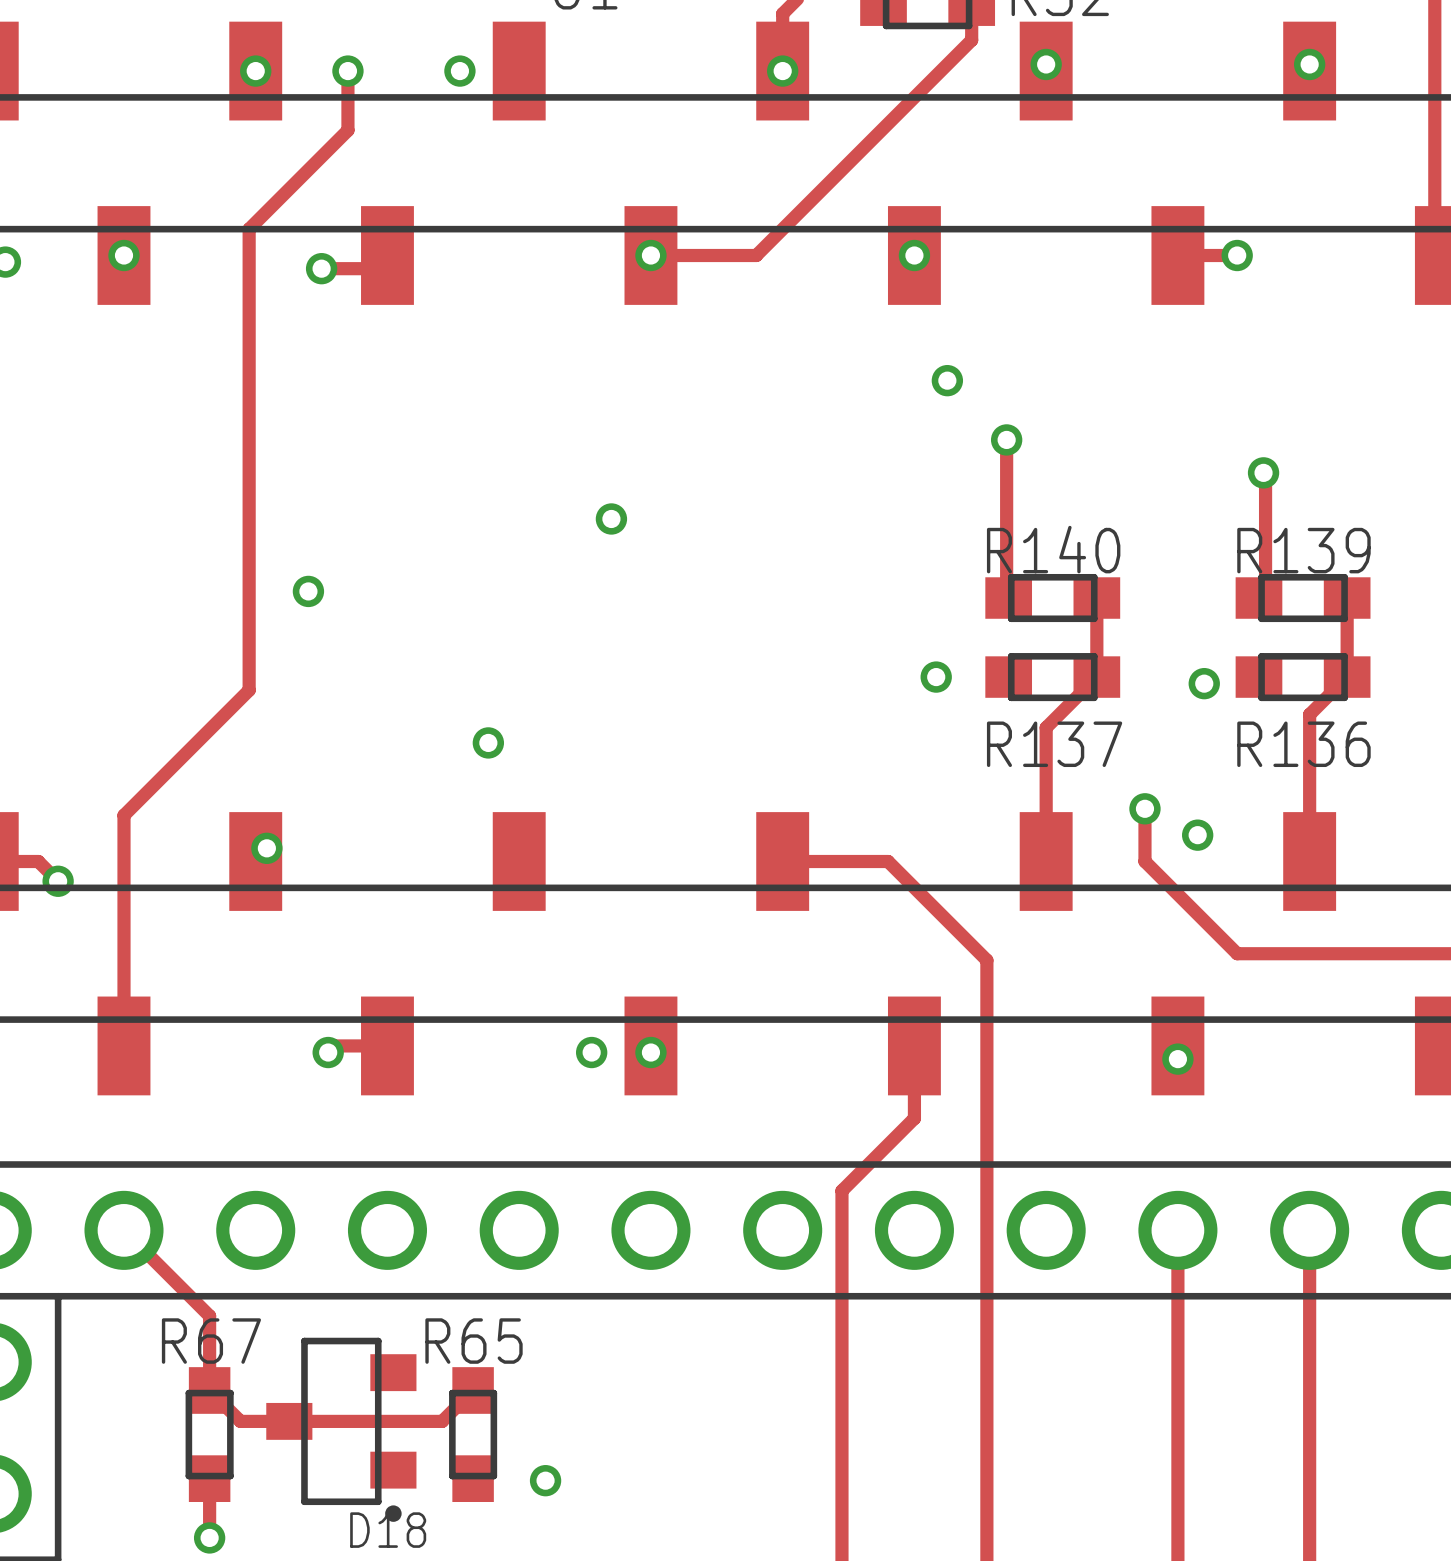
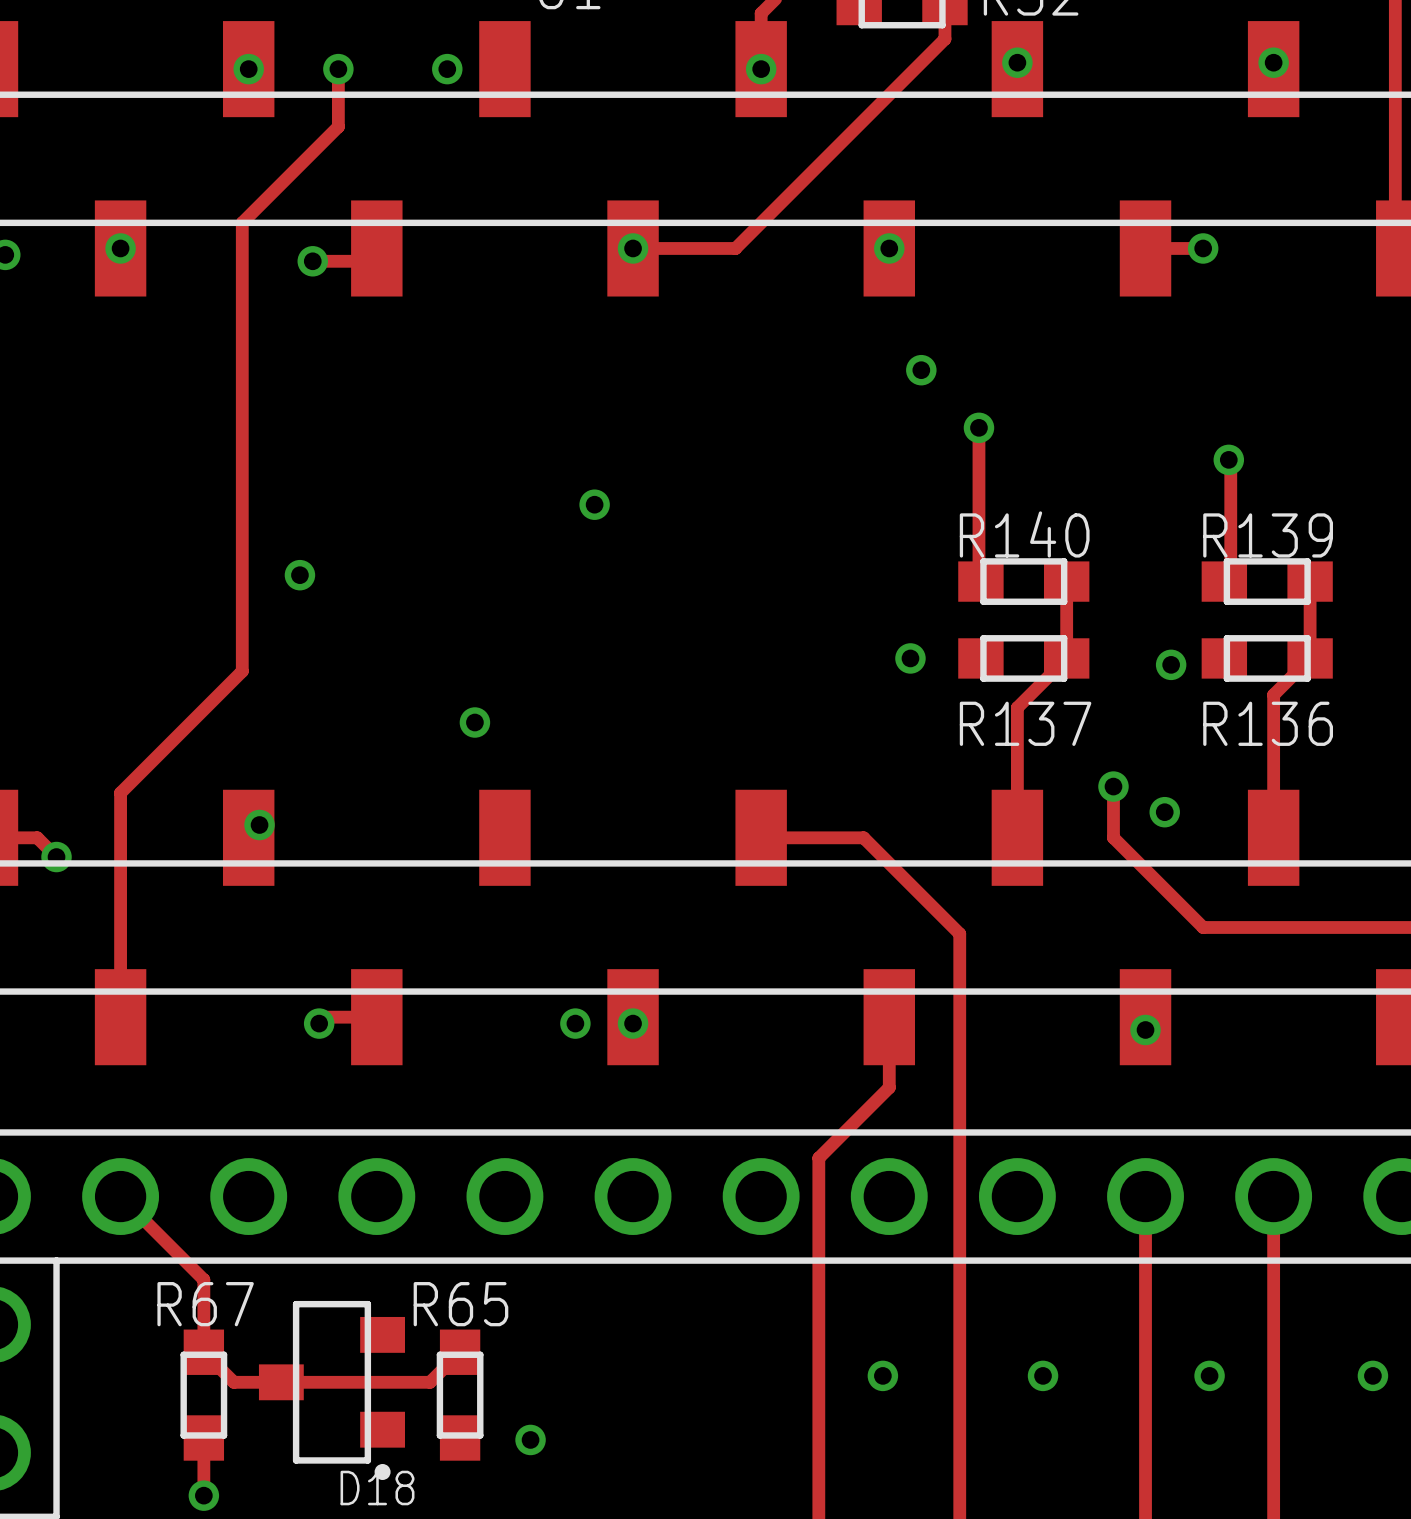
via: none -> (882, 1375)
via: none -> (1043, 1375)
via: none -> (1209, 1375)
via: none -> (1372, 1375)

